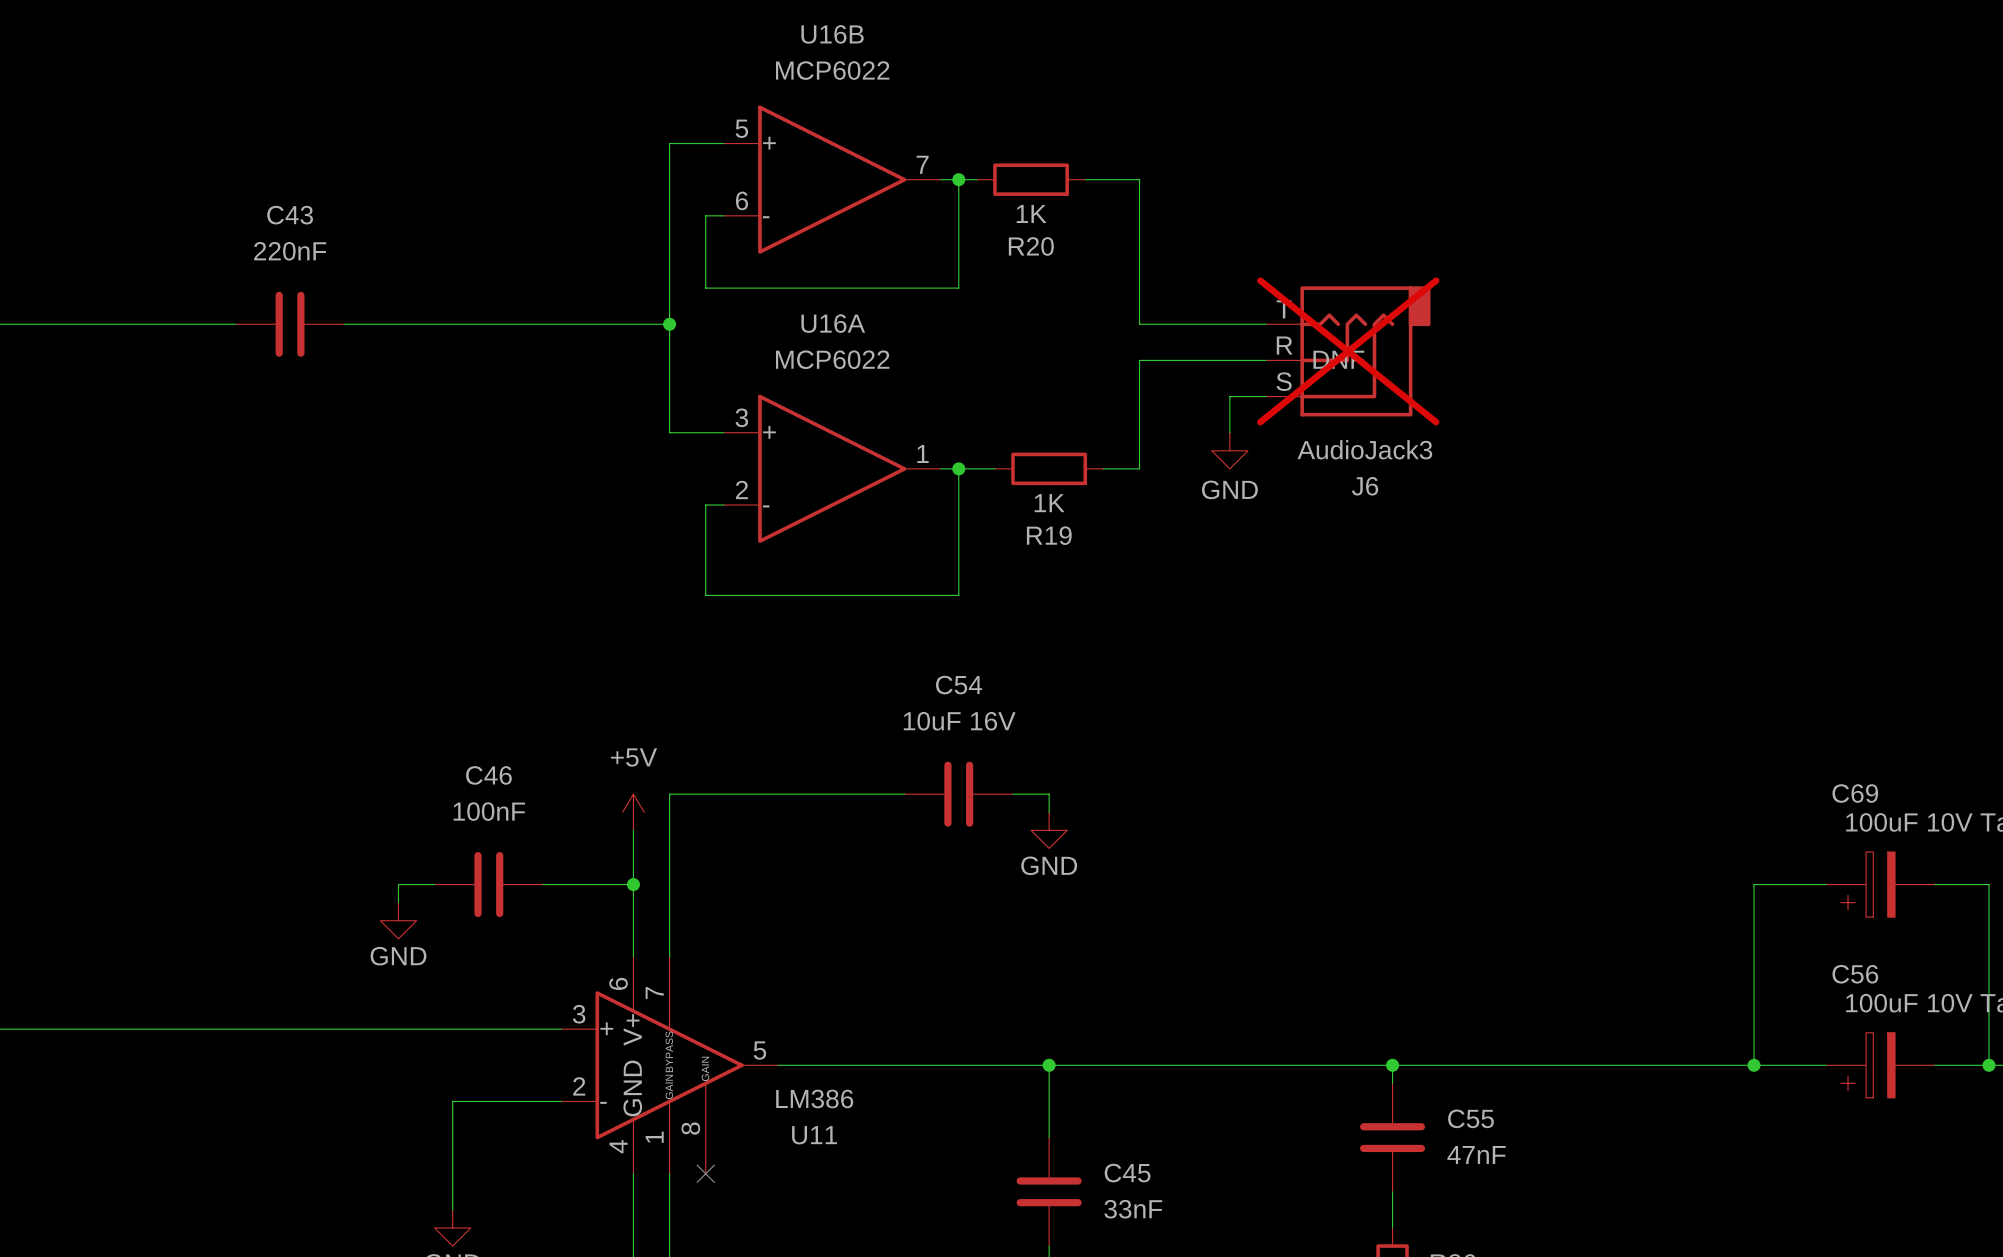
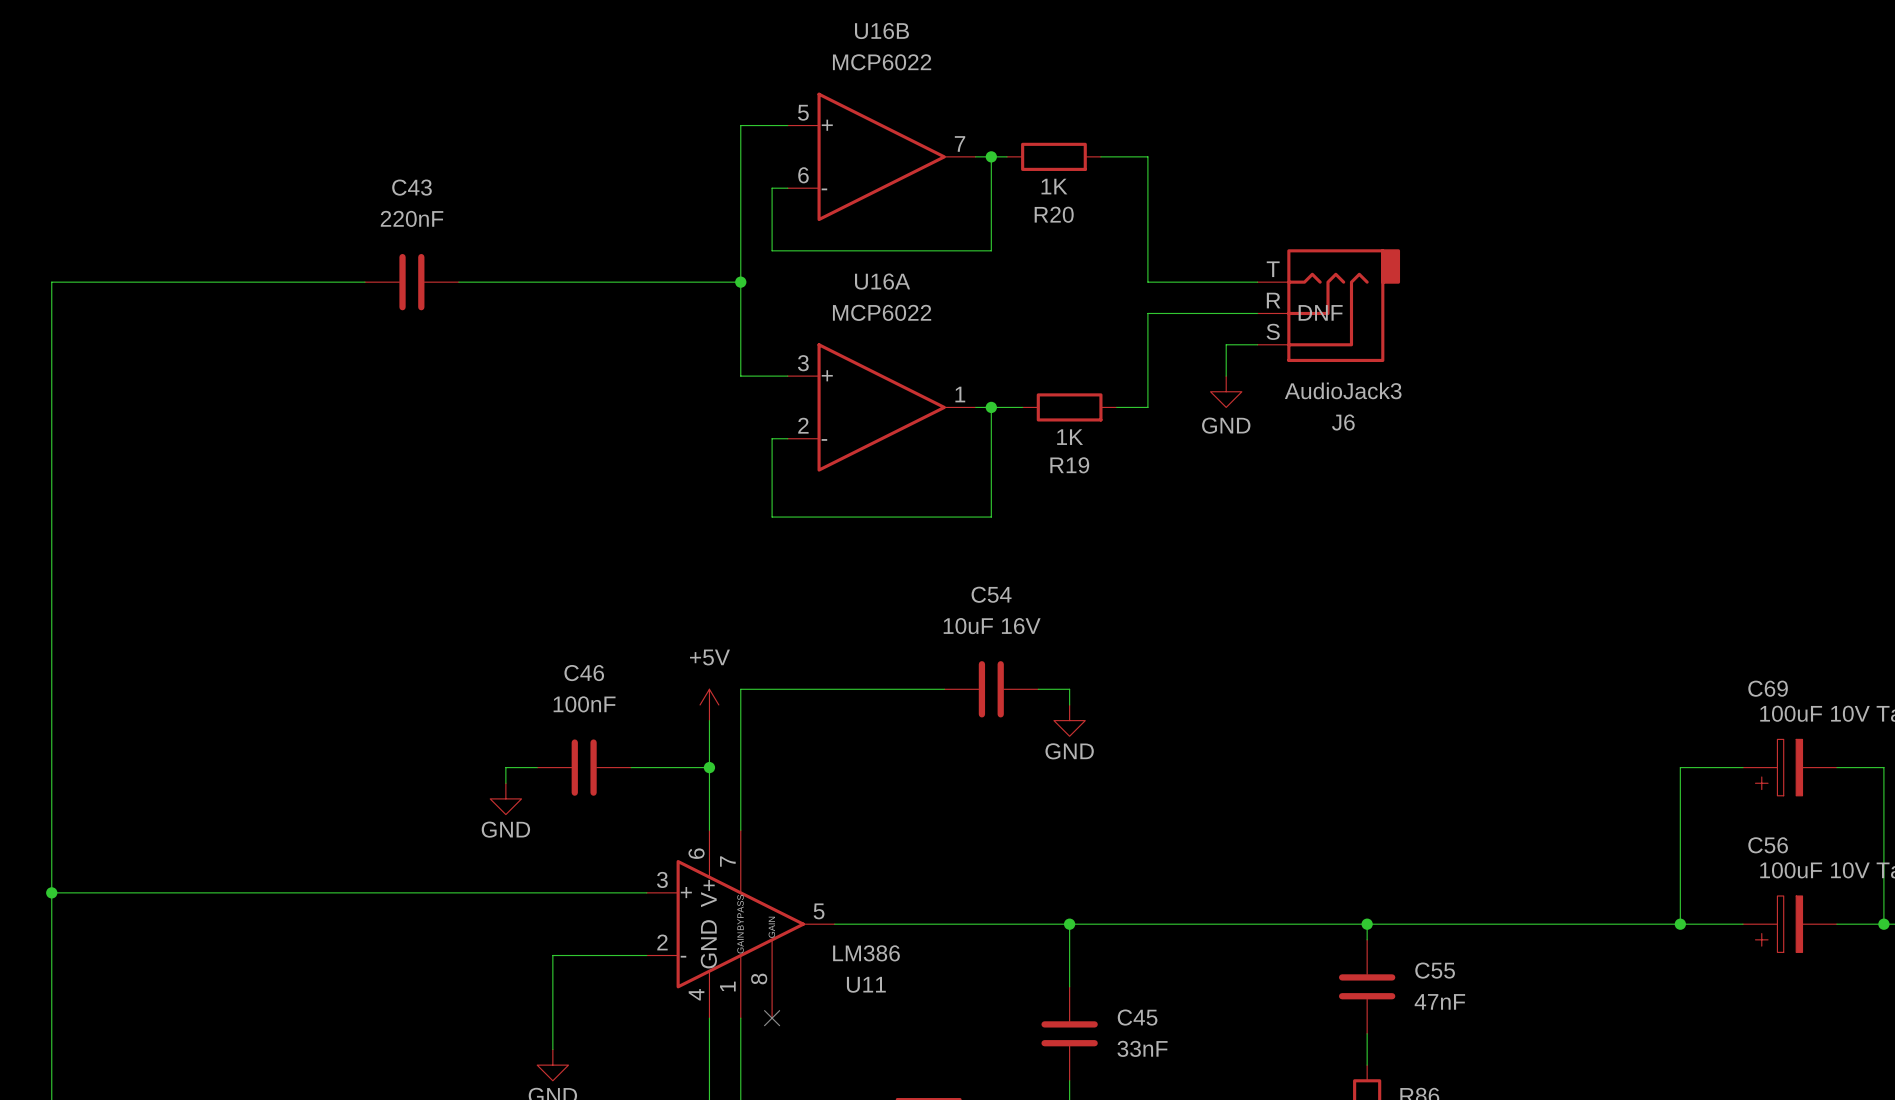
J6 do-not-place cross: (1348, 351) -> none

